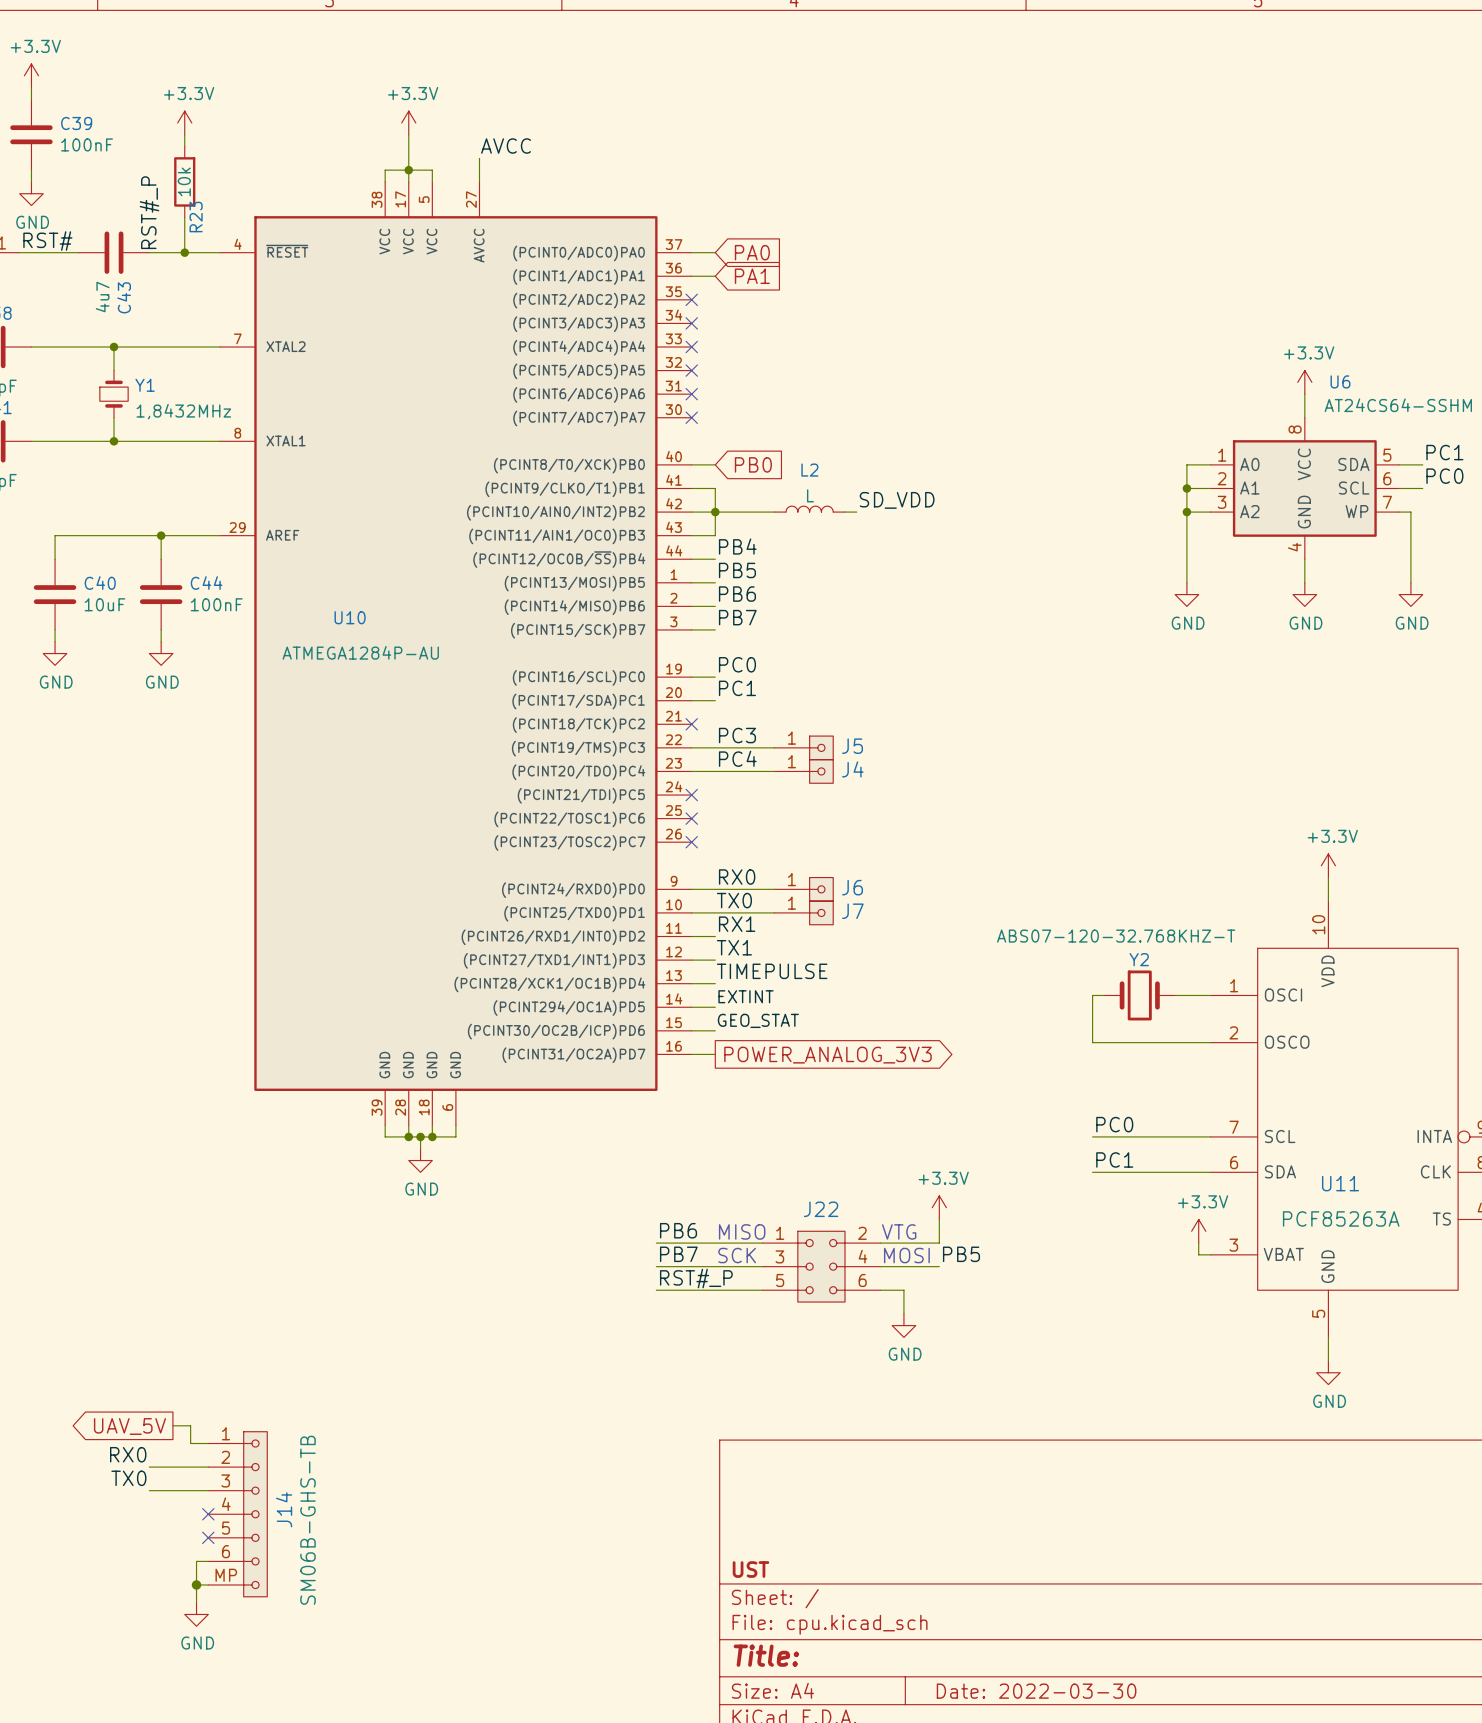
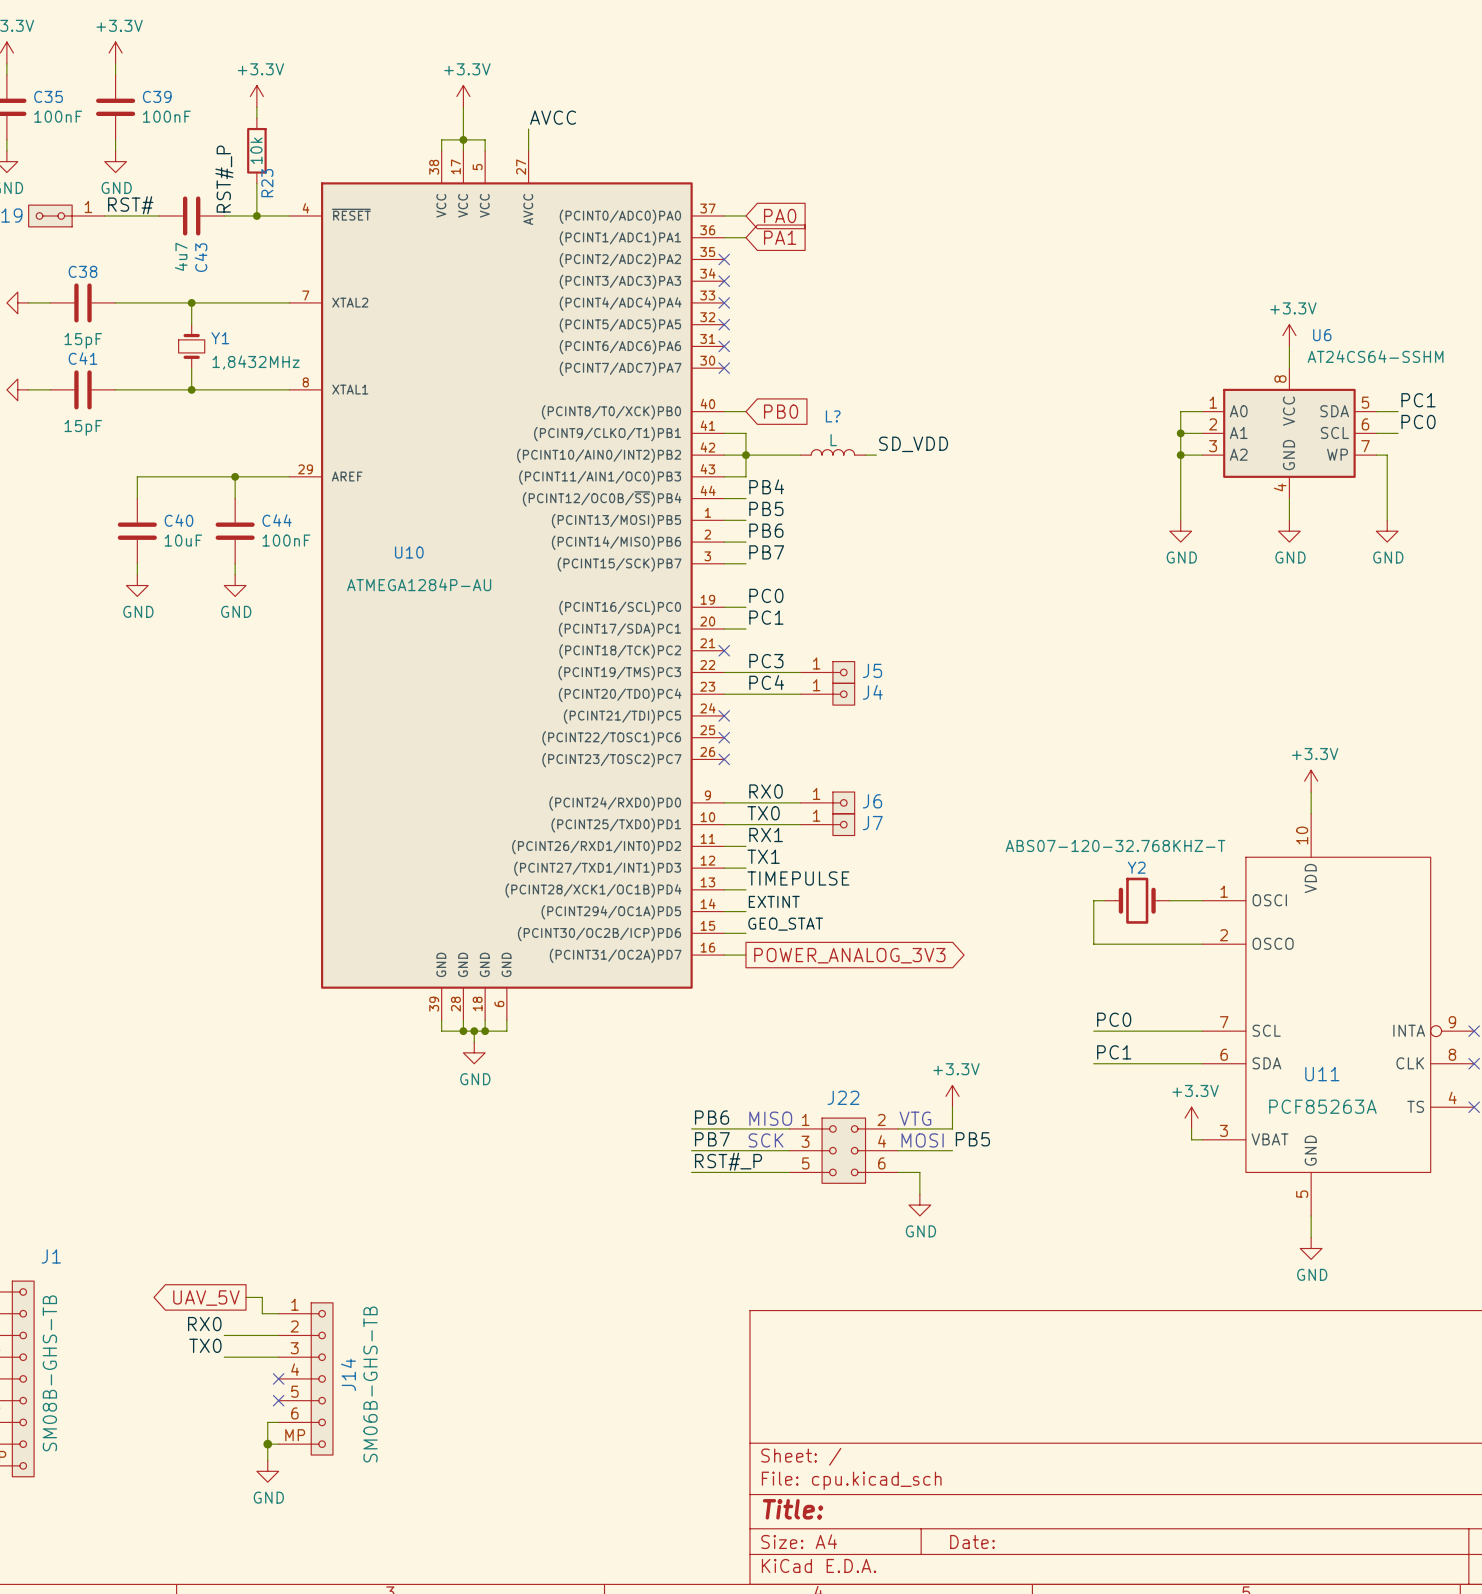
L2 name: L2 (809, 470) -> L? (833, 416)
title block: UST (751, 1569) -> none
title block: Date: 2022-03-30 (1036, 1691) -> Date: (972, 1542)

